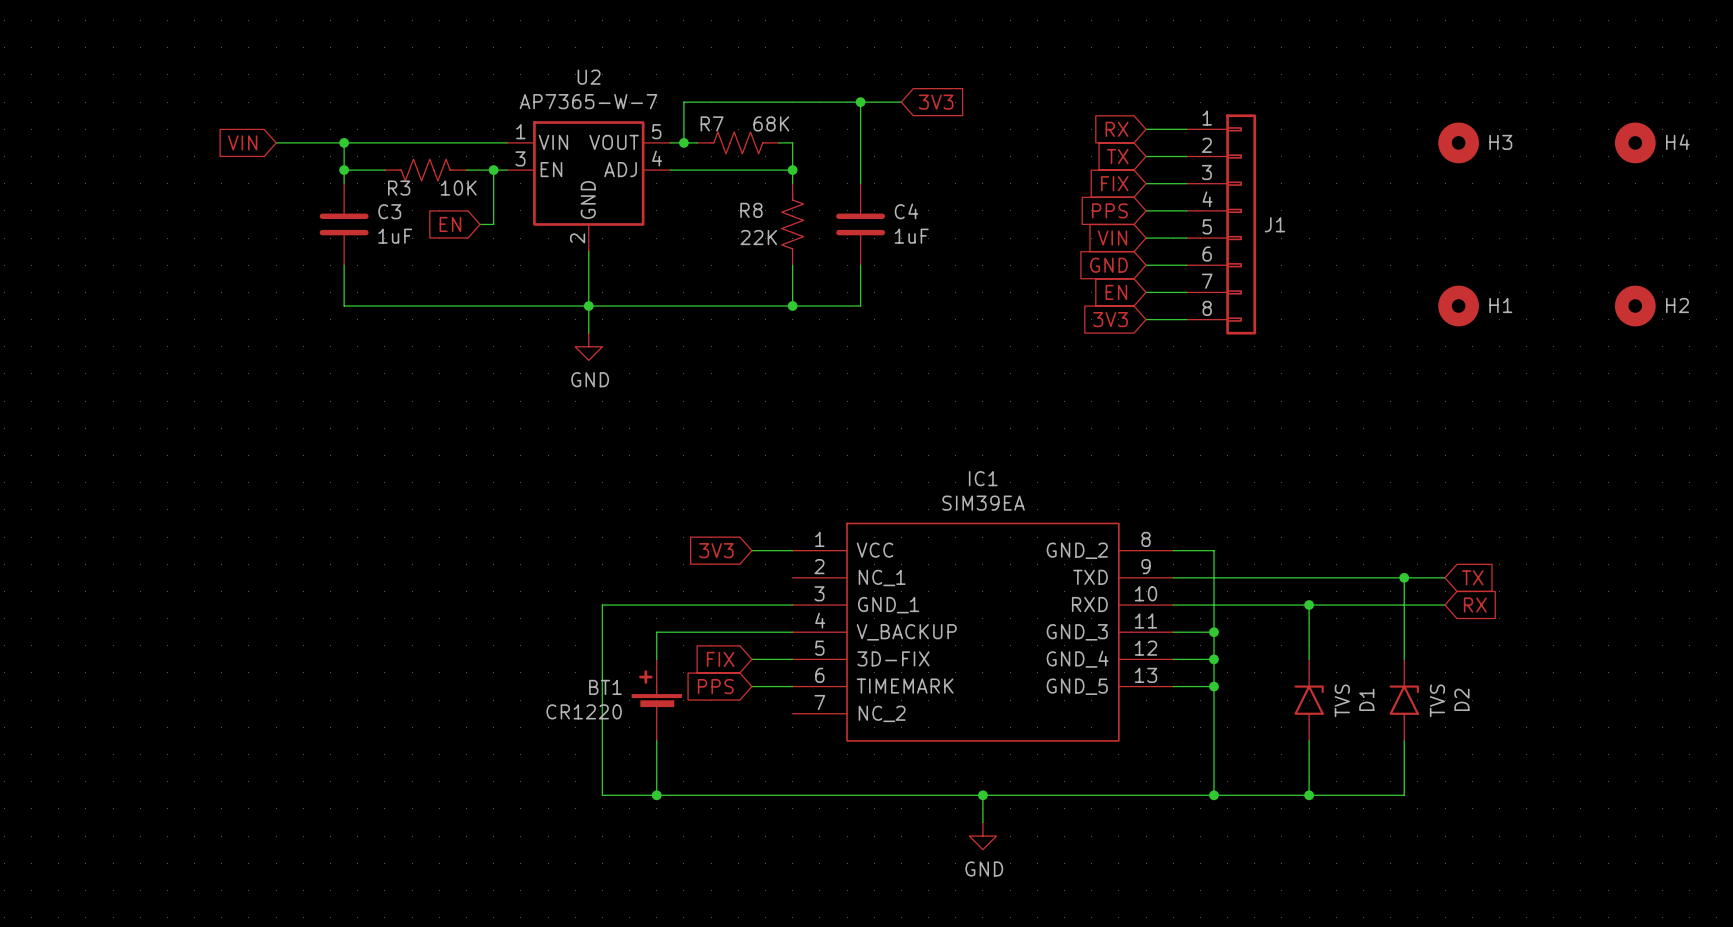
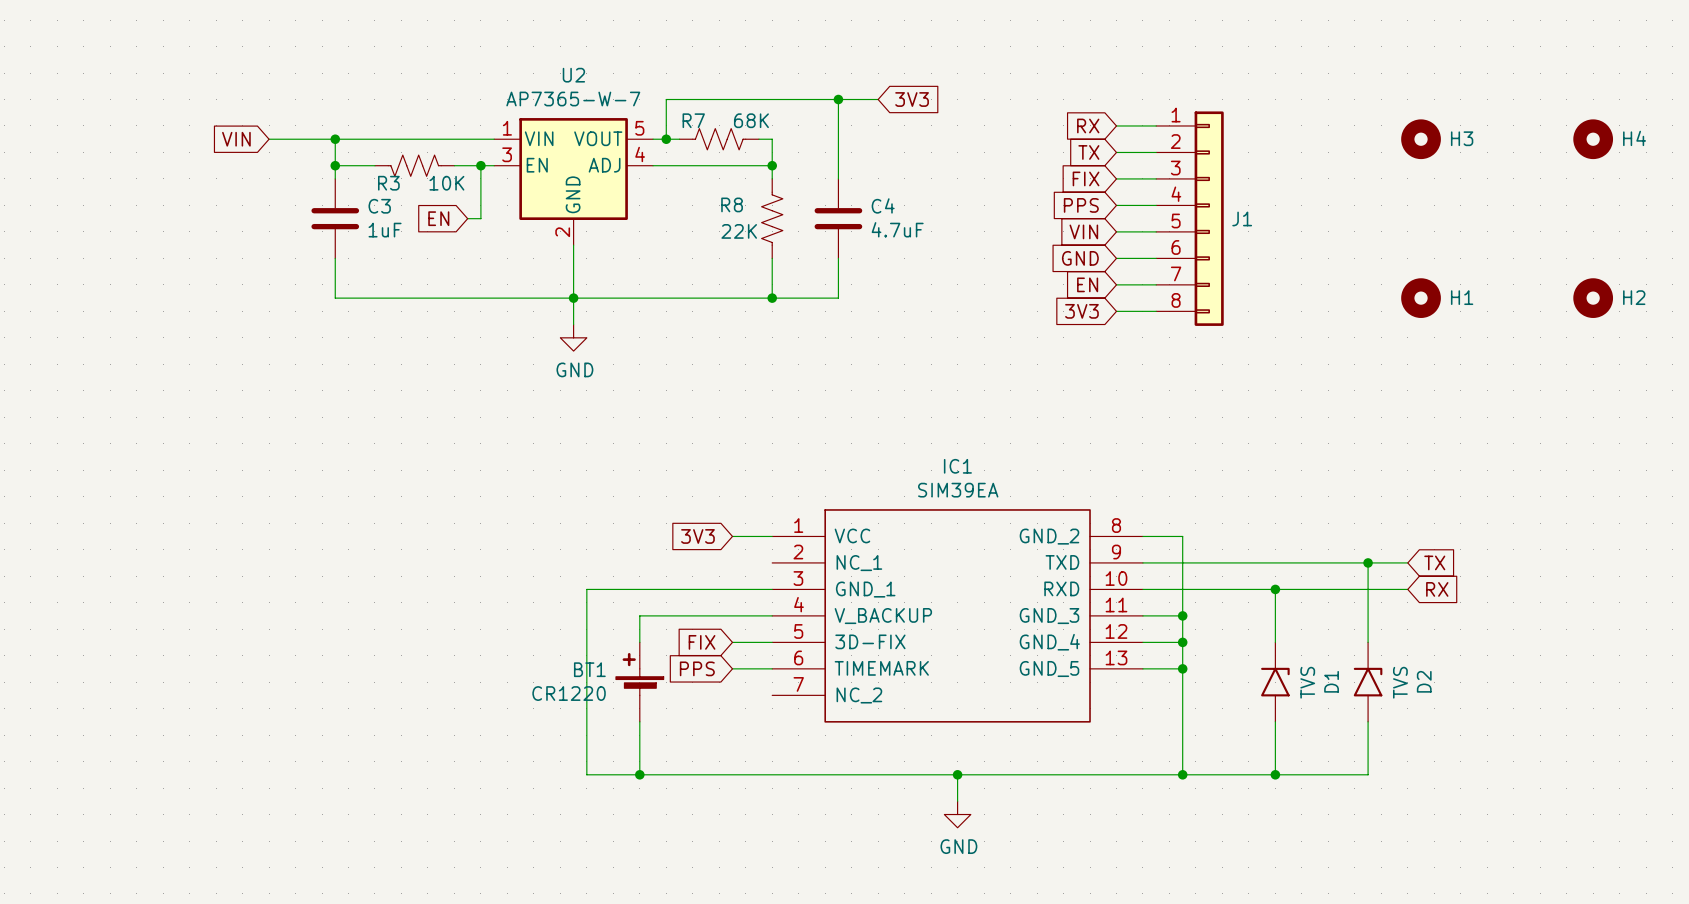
C4 value: 1uF (911, 236) -> 4.7uF (897, 229)

